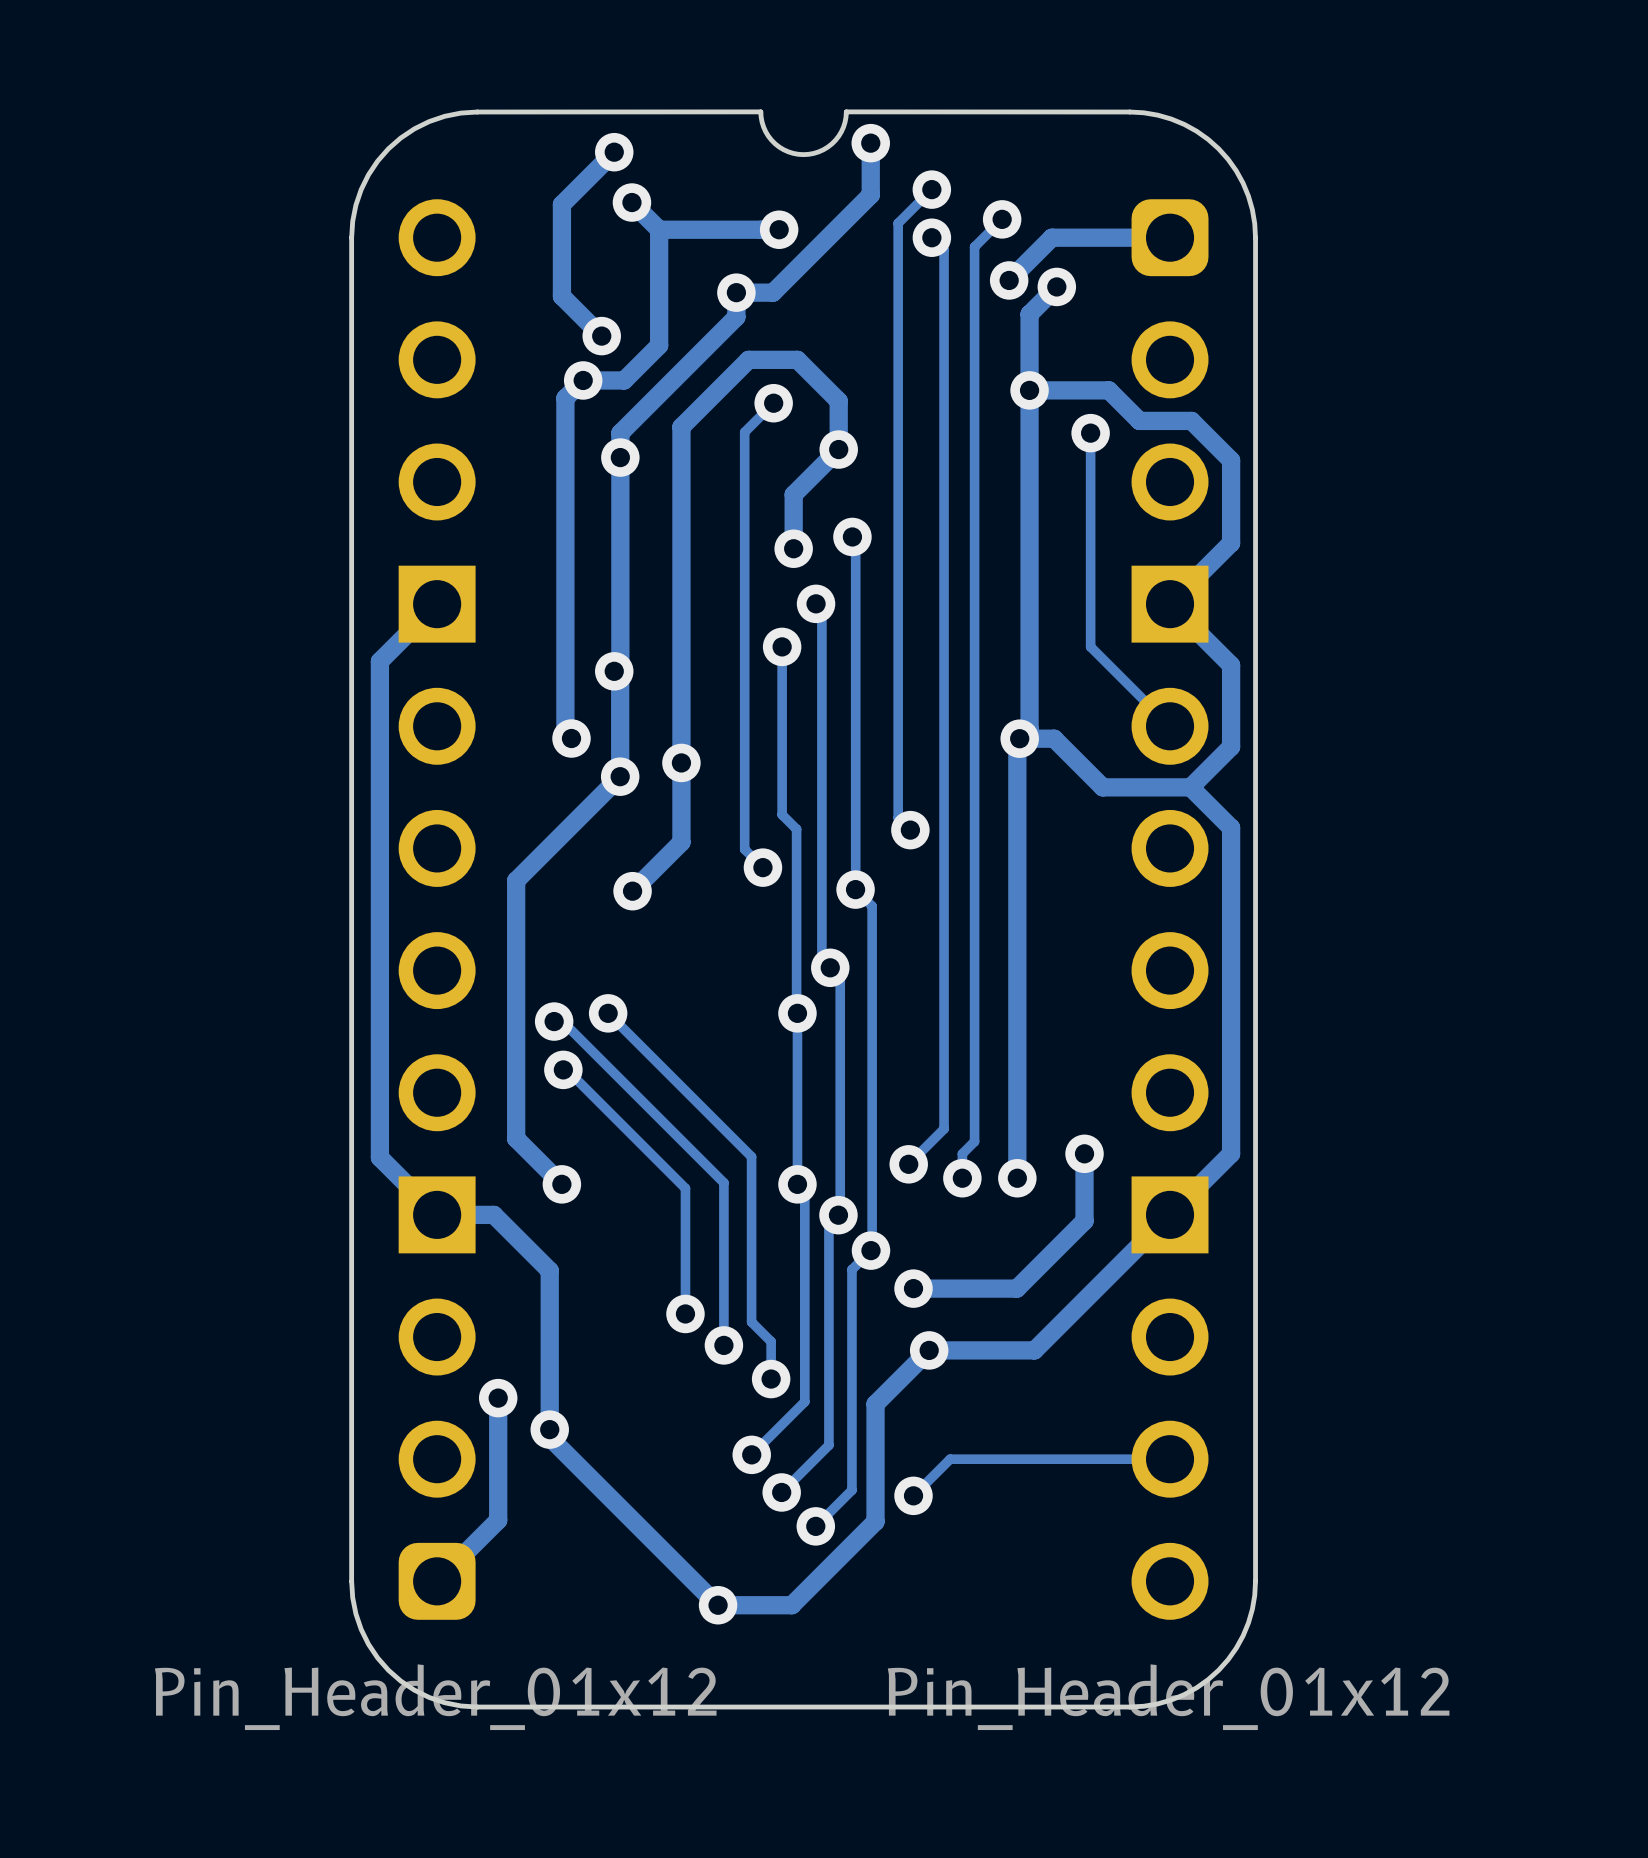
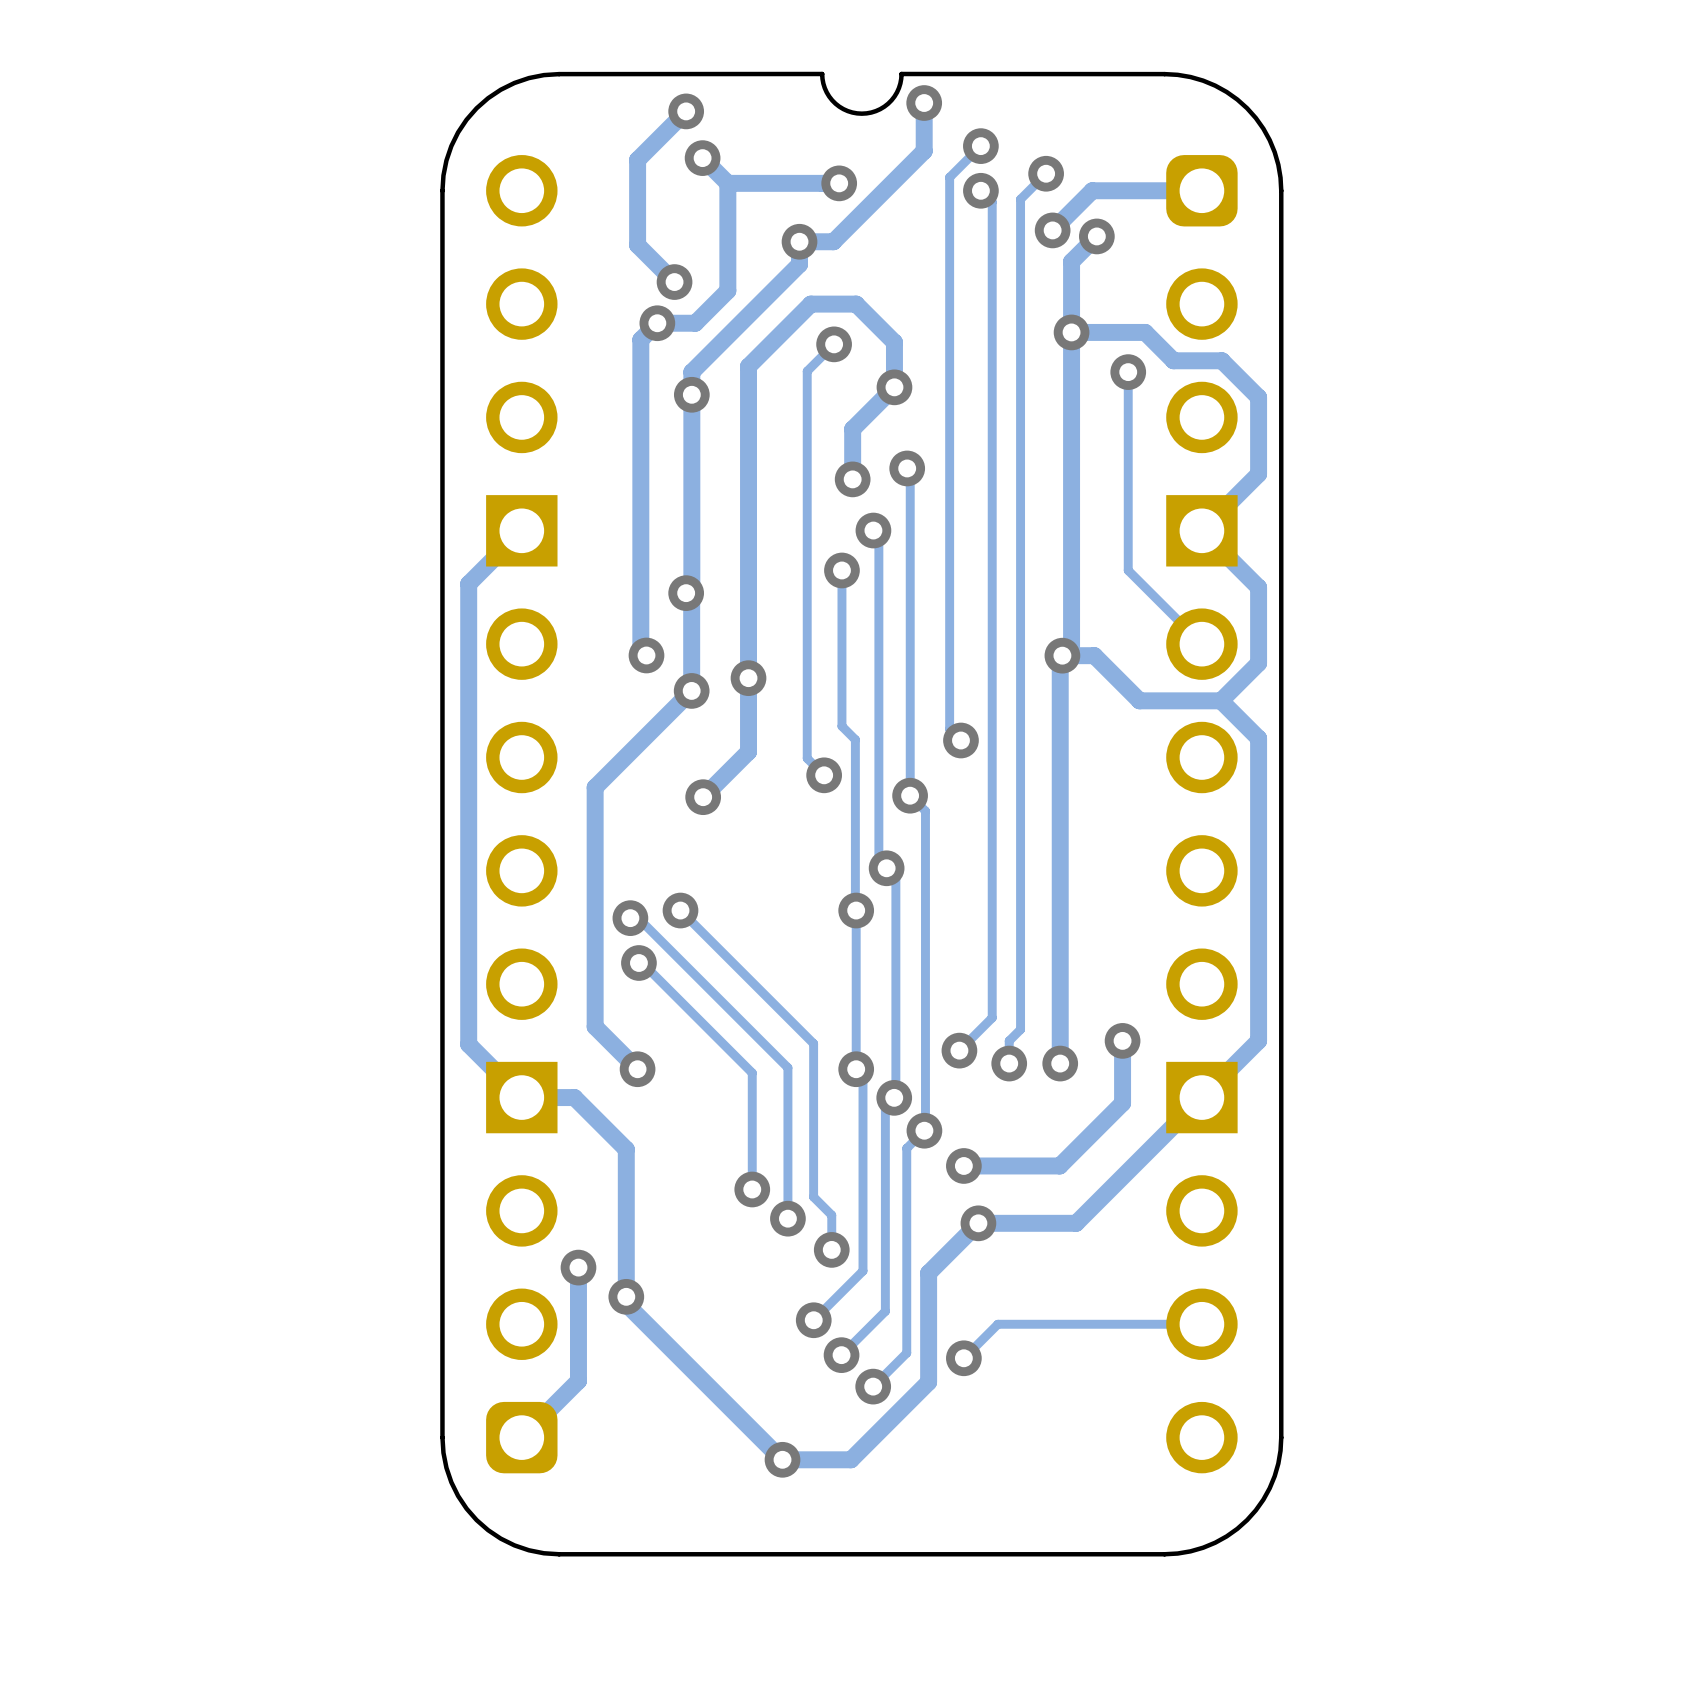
drawing: [154, 1664, 1450, 1731] -> none

